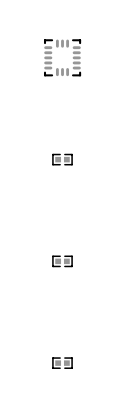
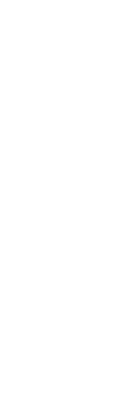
part: (60, 57) -> none
part: (62, 159) -> none
part: (62, 261) -> none
part: (62, 363) -> none

